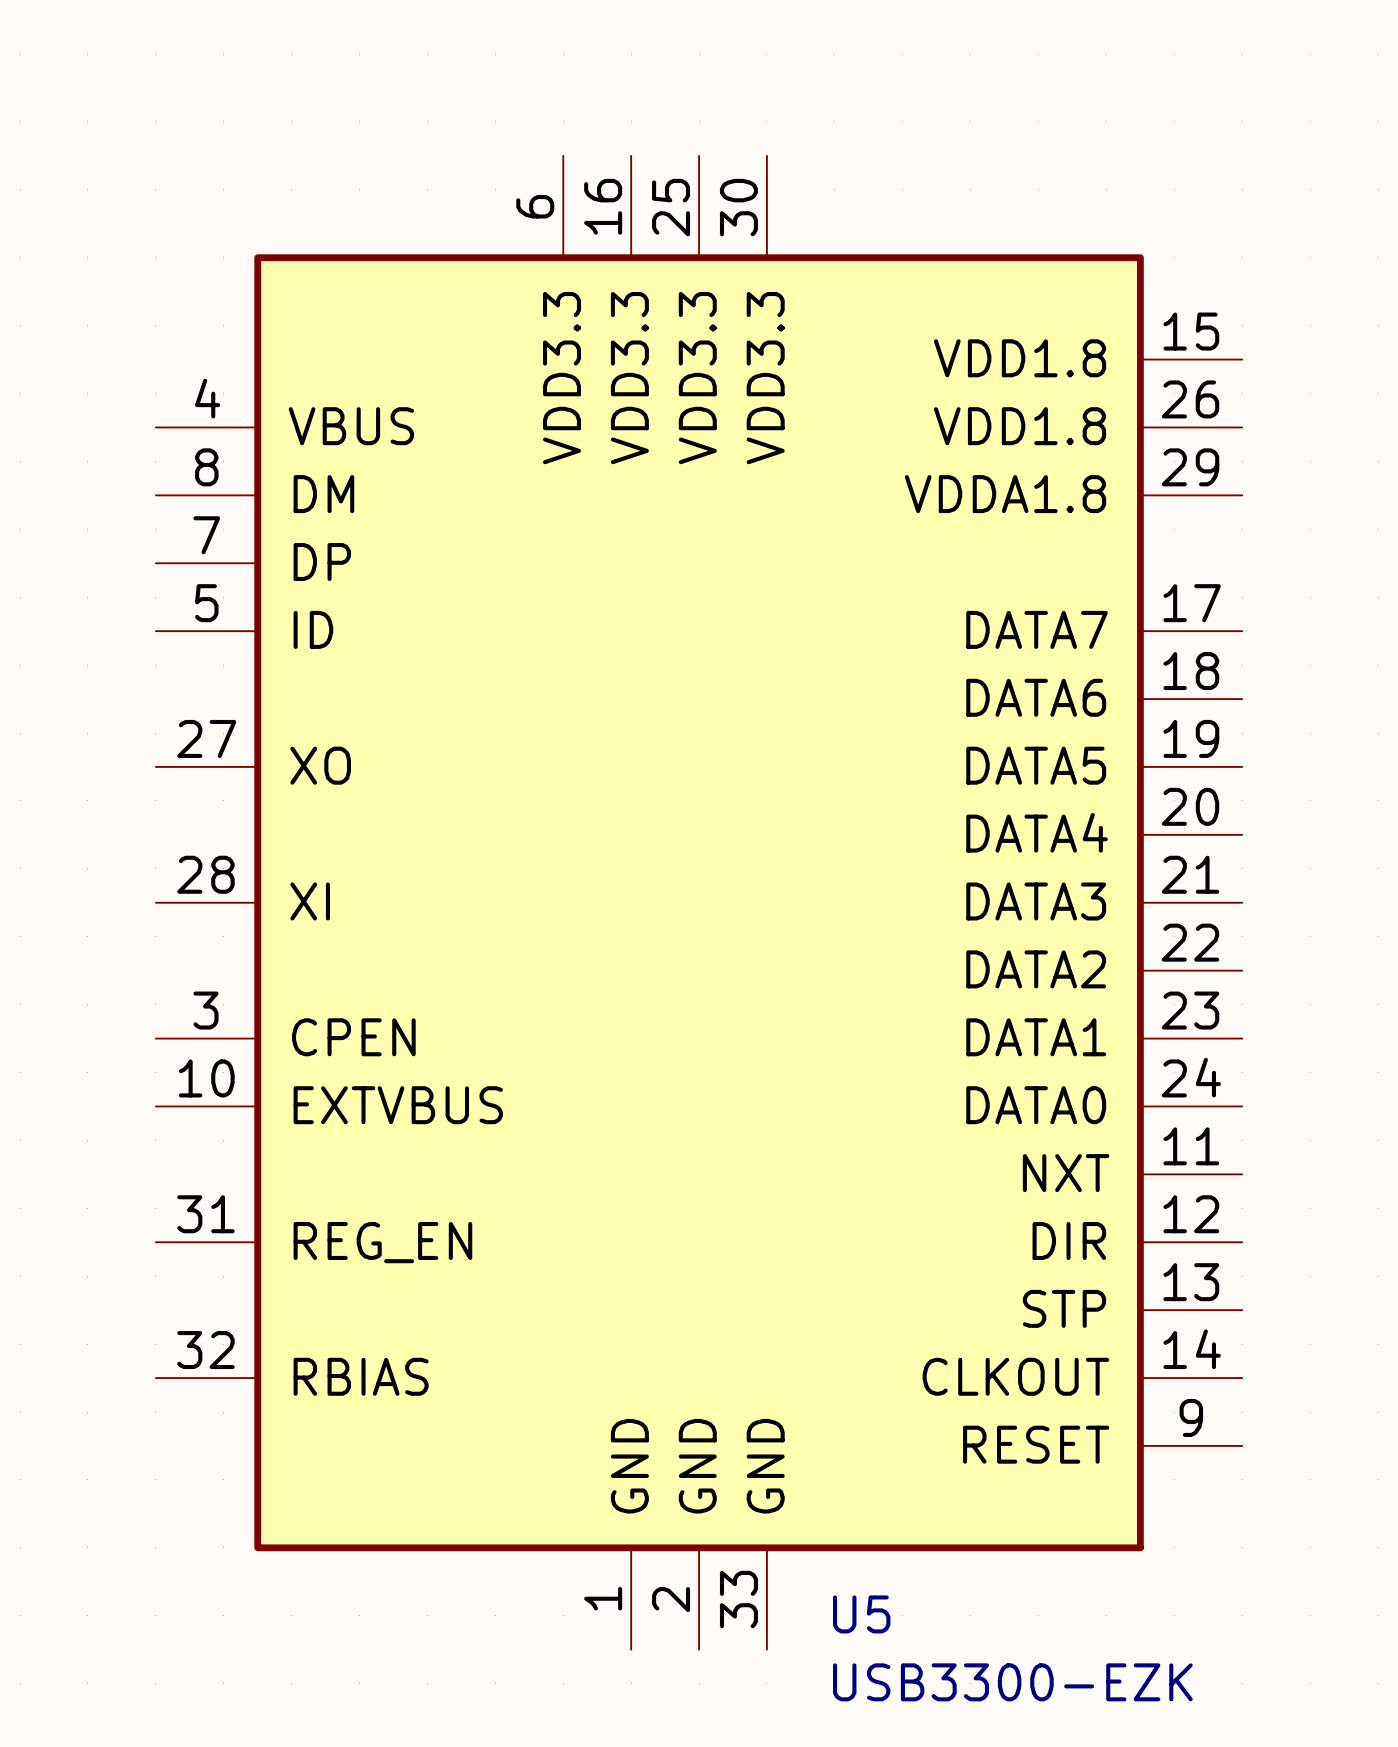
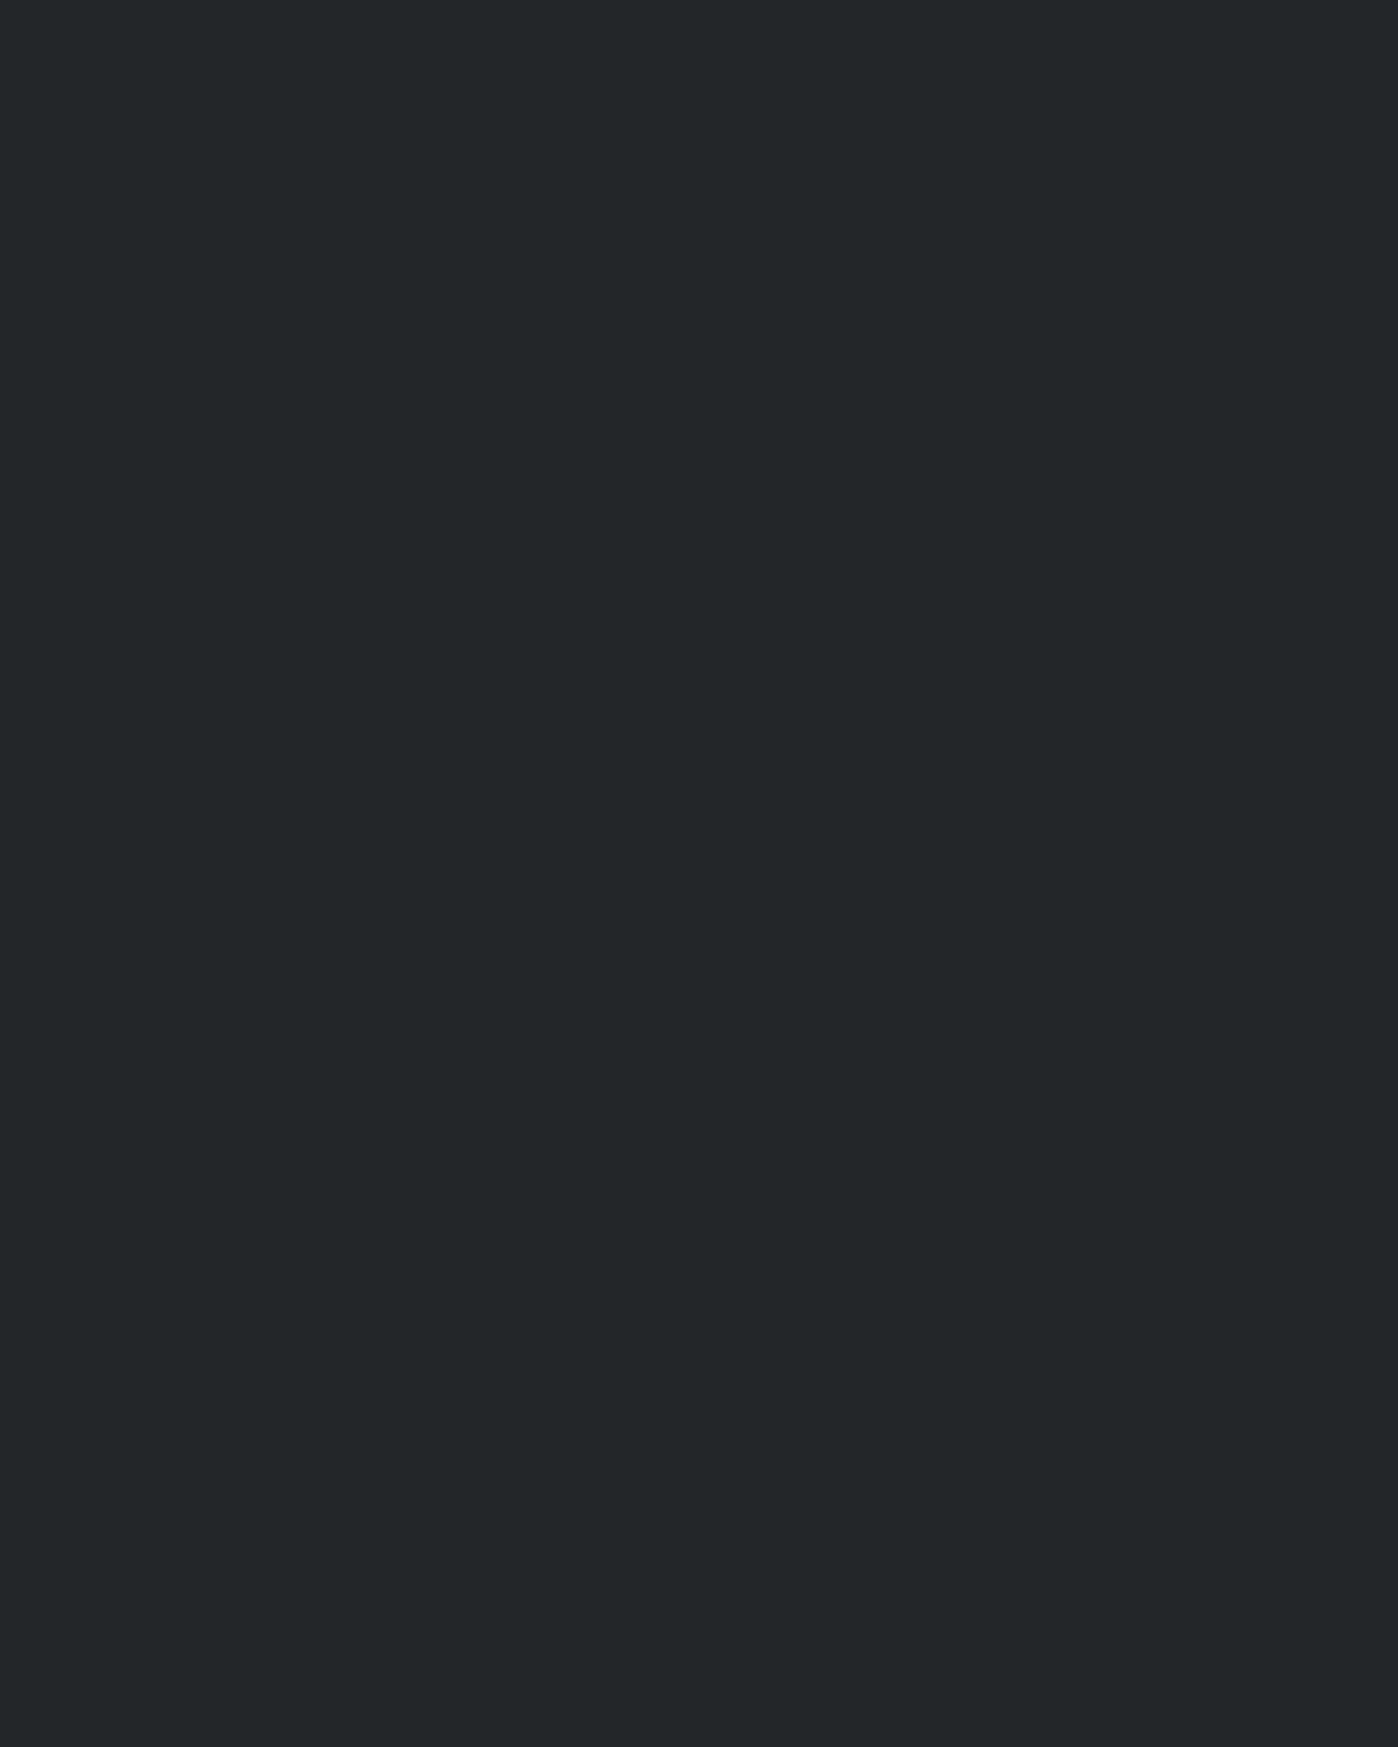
U5: USB3300-EZK (699, 902) -> none

